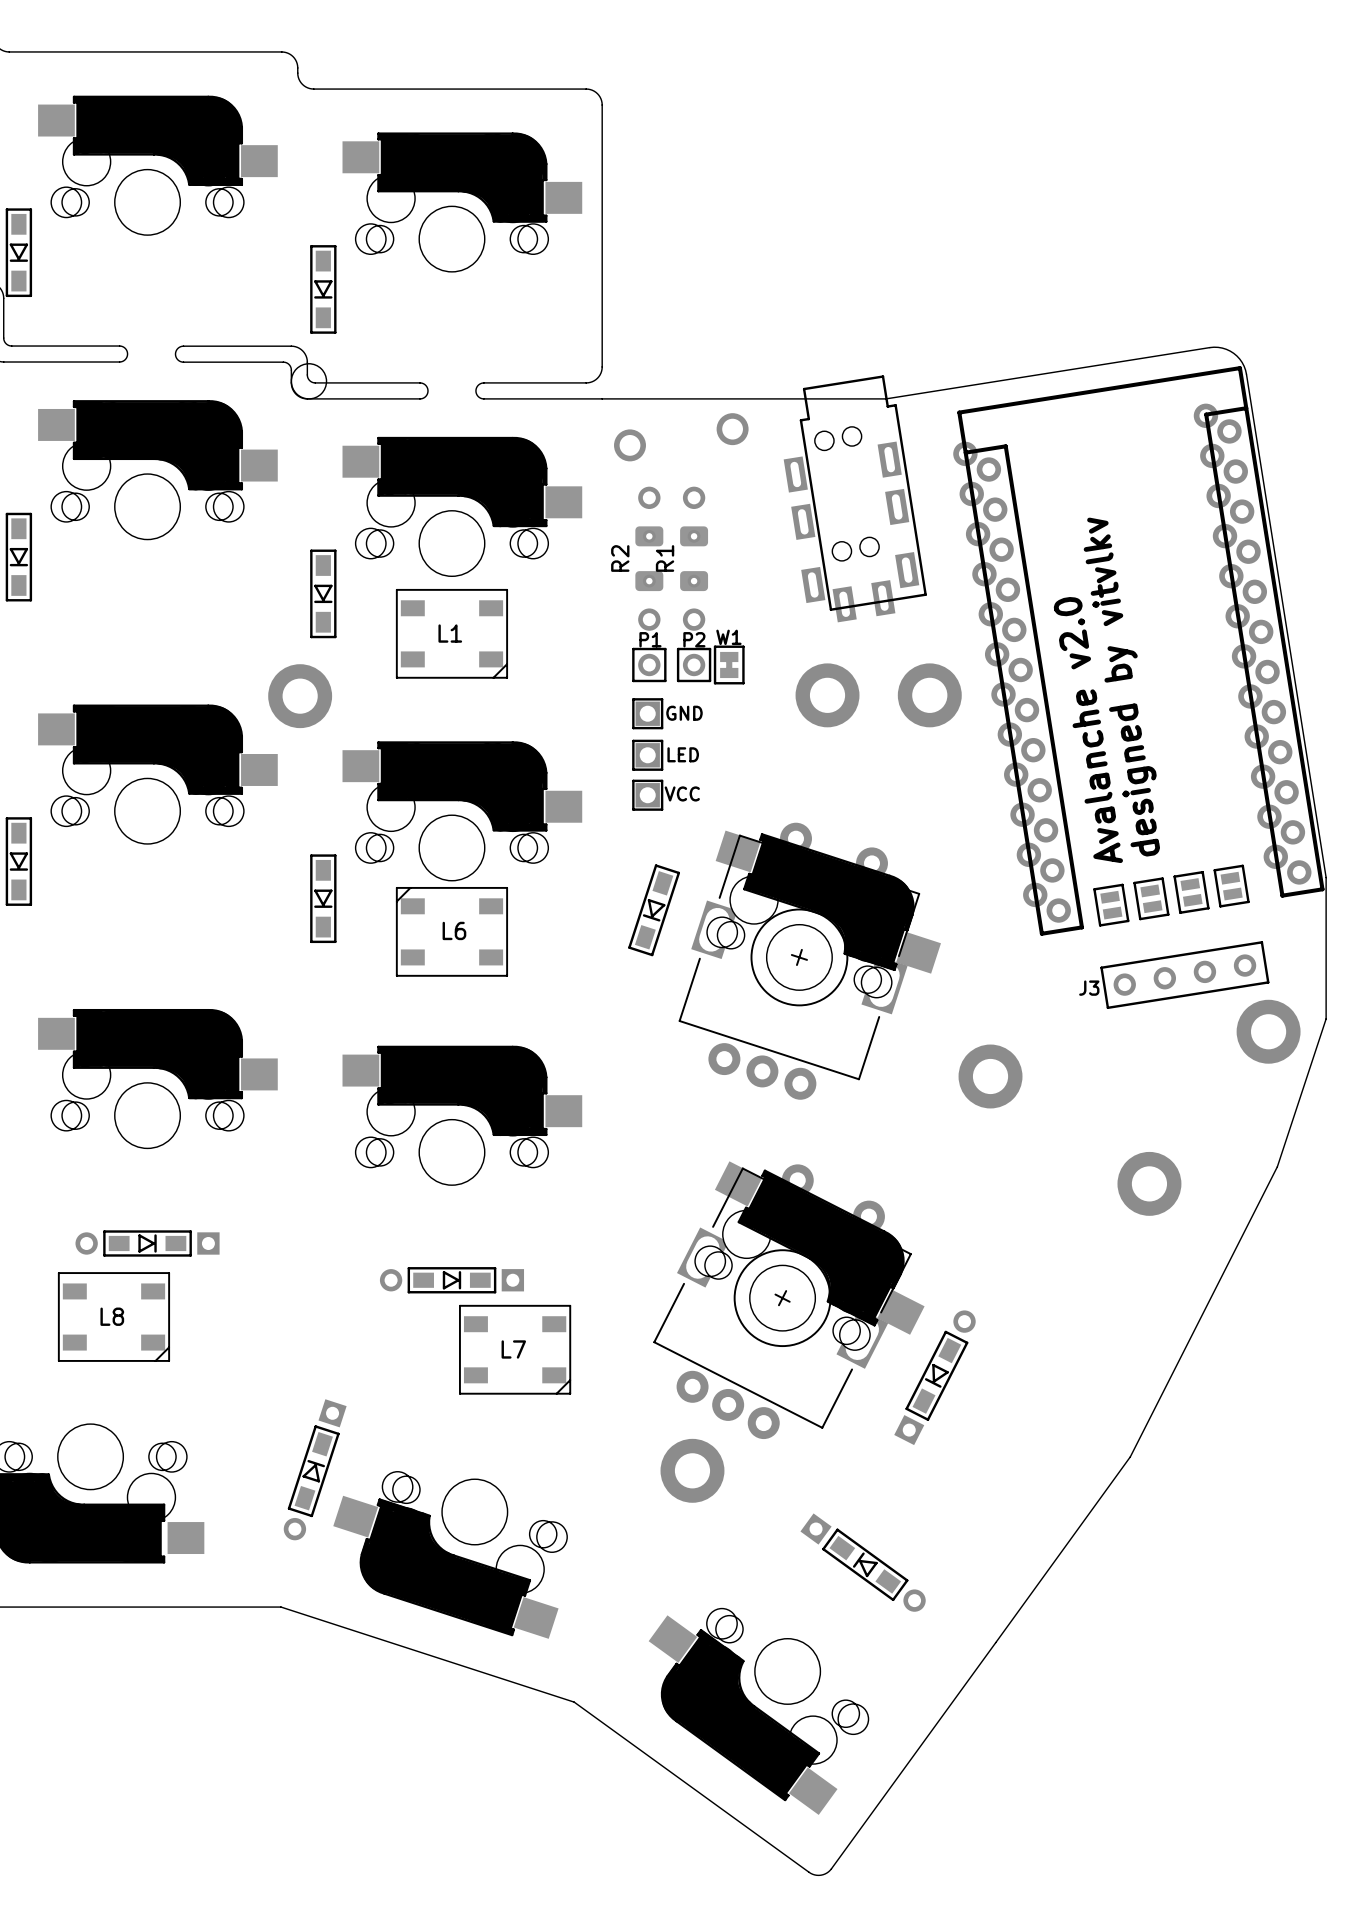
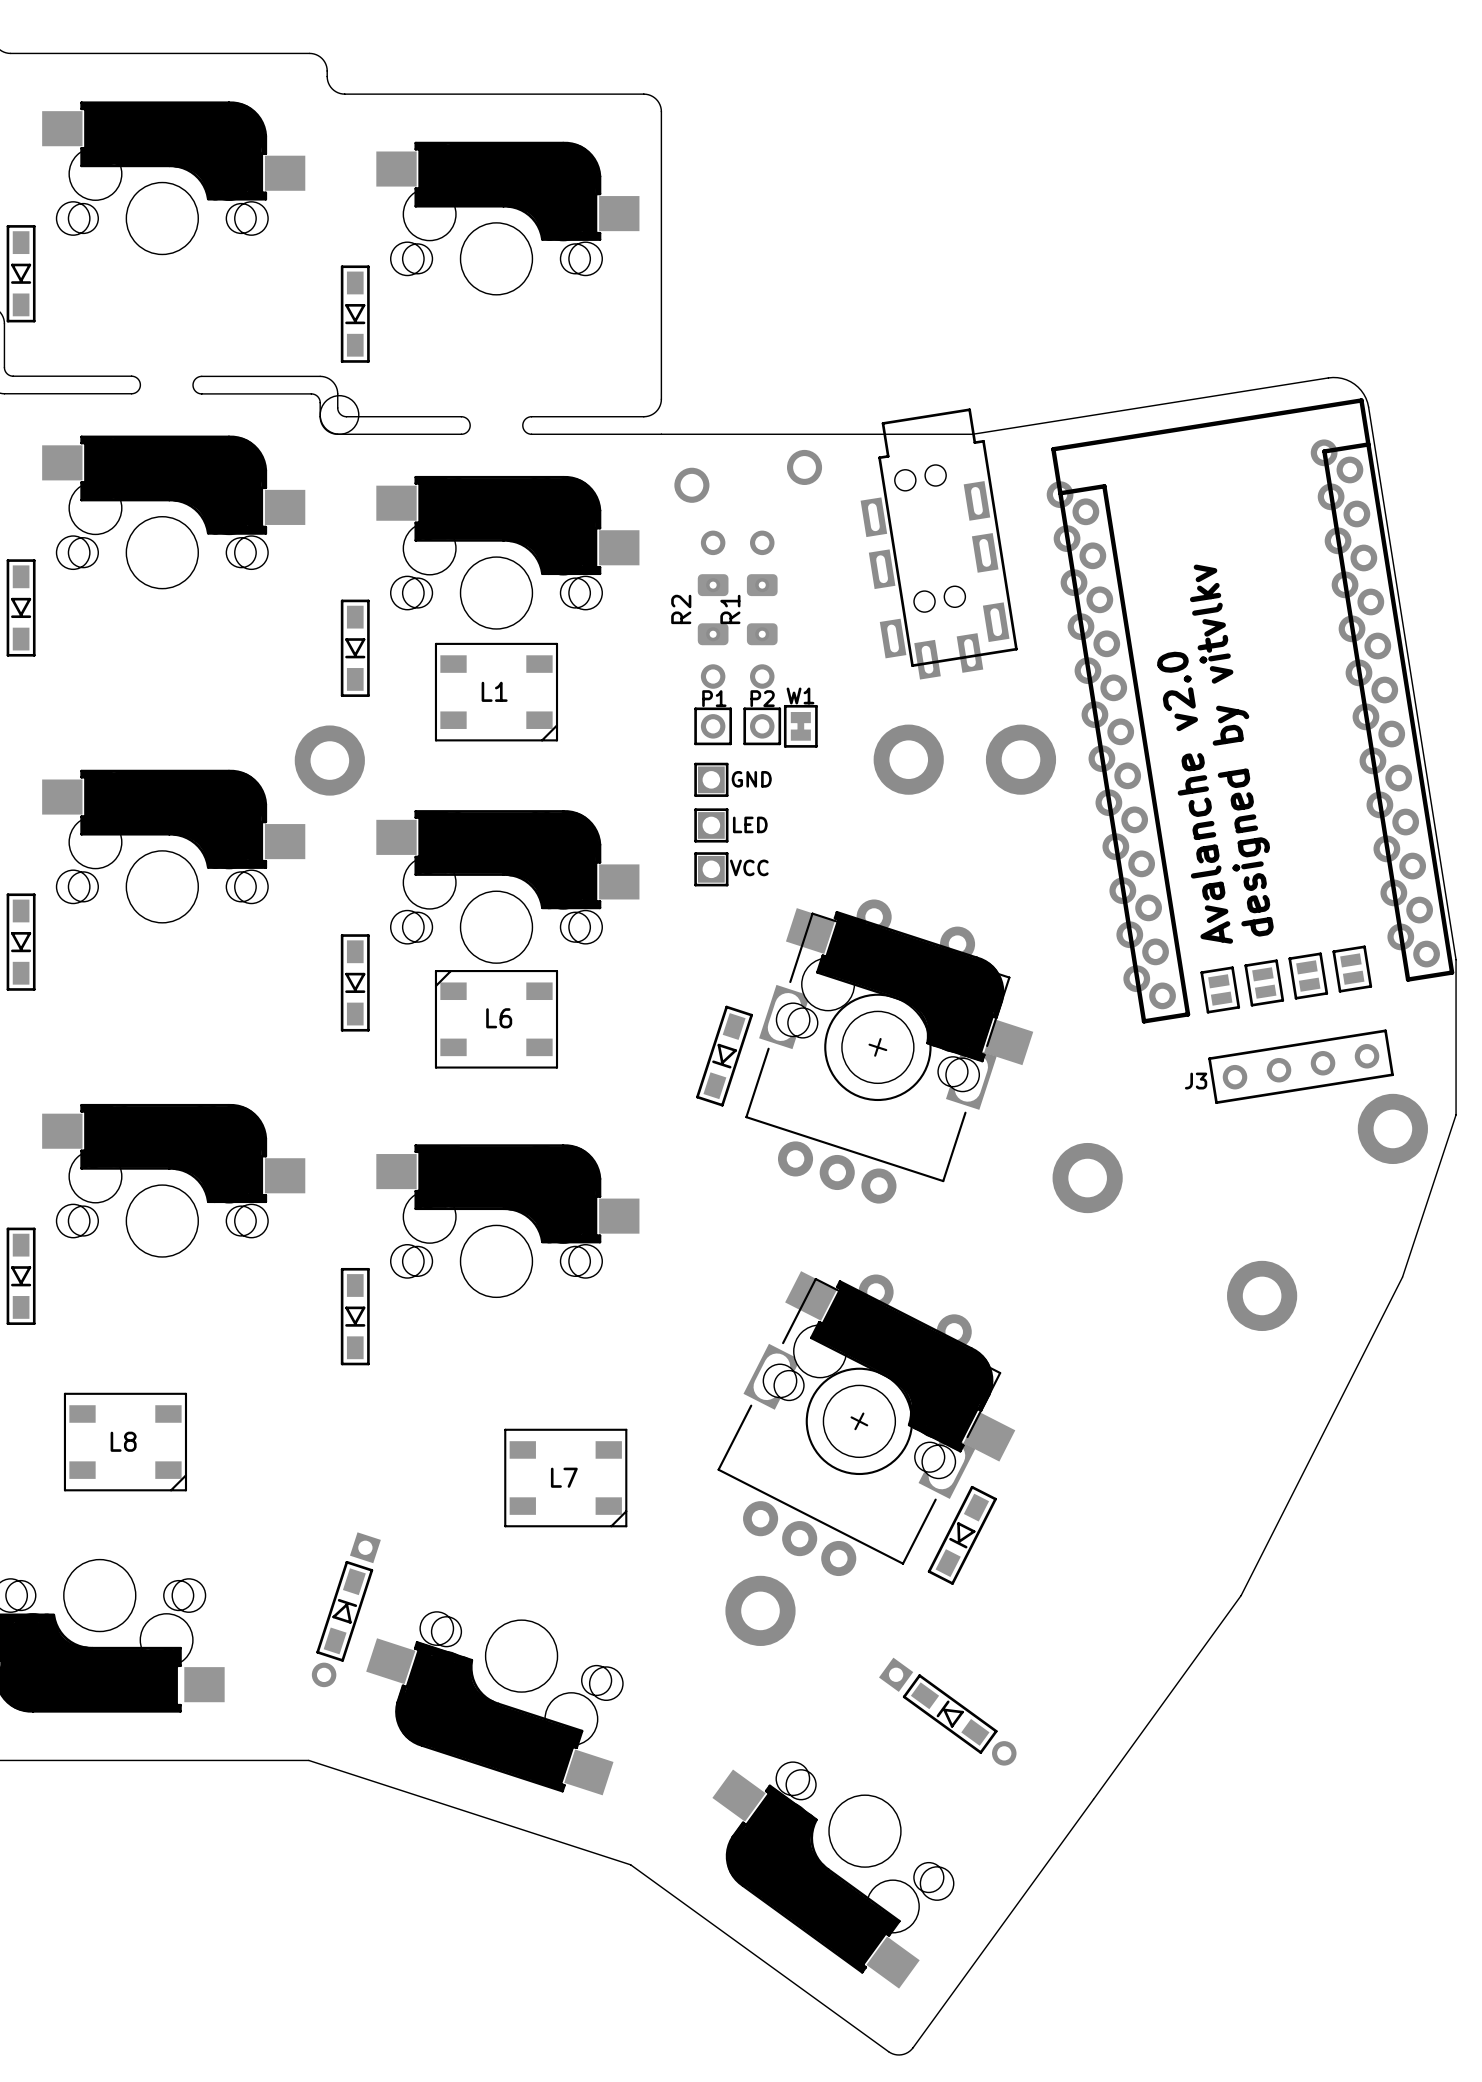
part position: (654, 910) -> (724, 1056)
part: none -> (21, 1276)
part: none -> (355, 1316)
part: (147, 1243) -> none
part: (451, 1280) -> none
part: (934, 1377) -> none
part: none -> (962, 1535)

